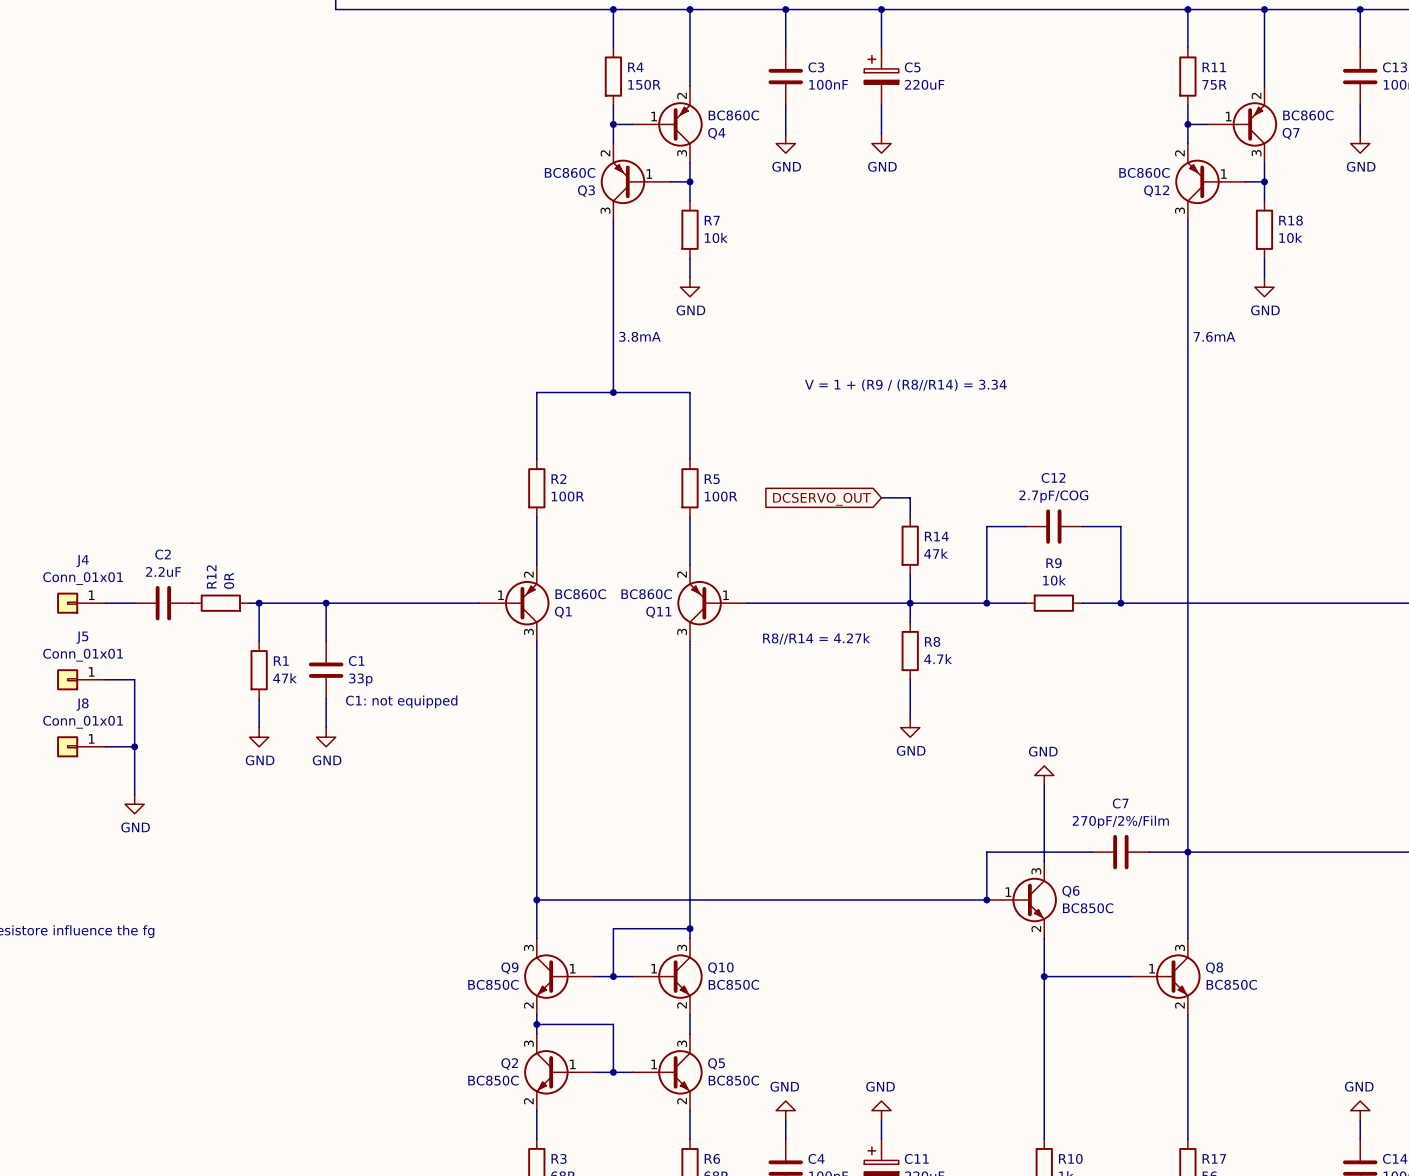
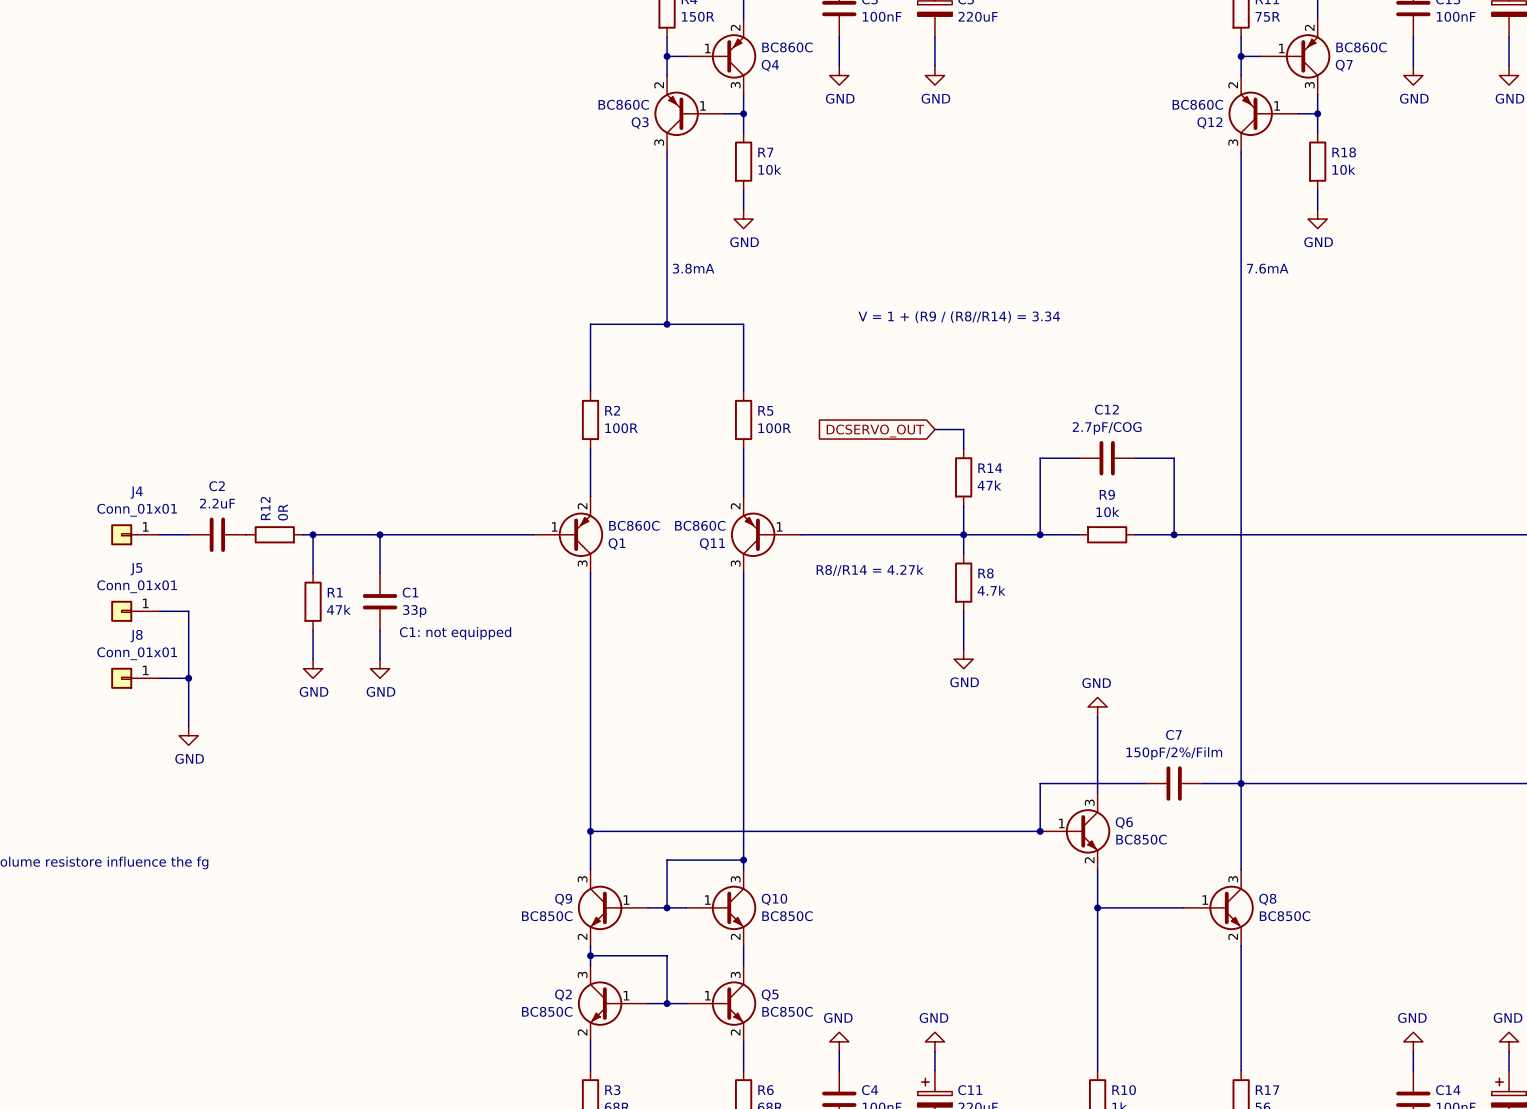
C7 value: 270pF/2%/Film (1120, 822) -> 150pF/2%/Film (1174, 753)

